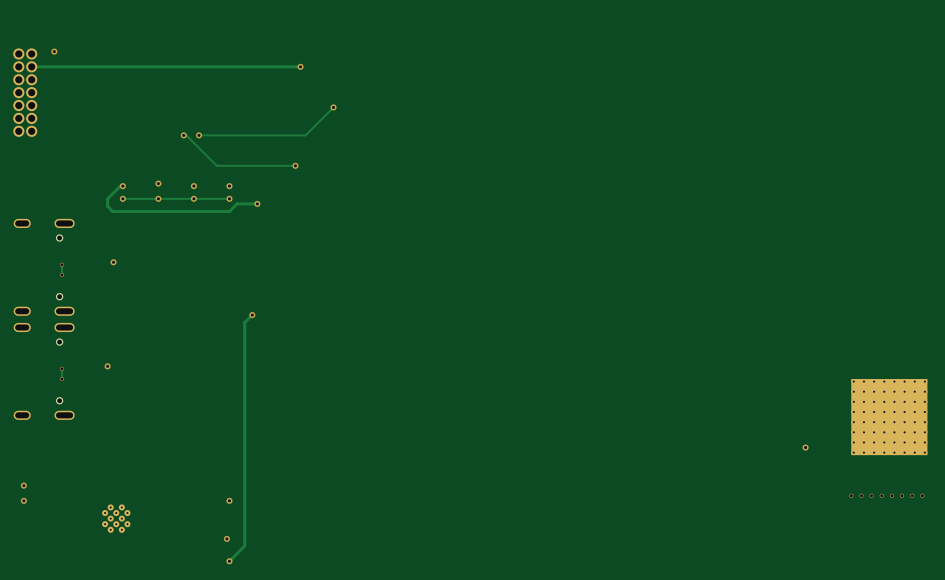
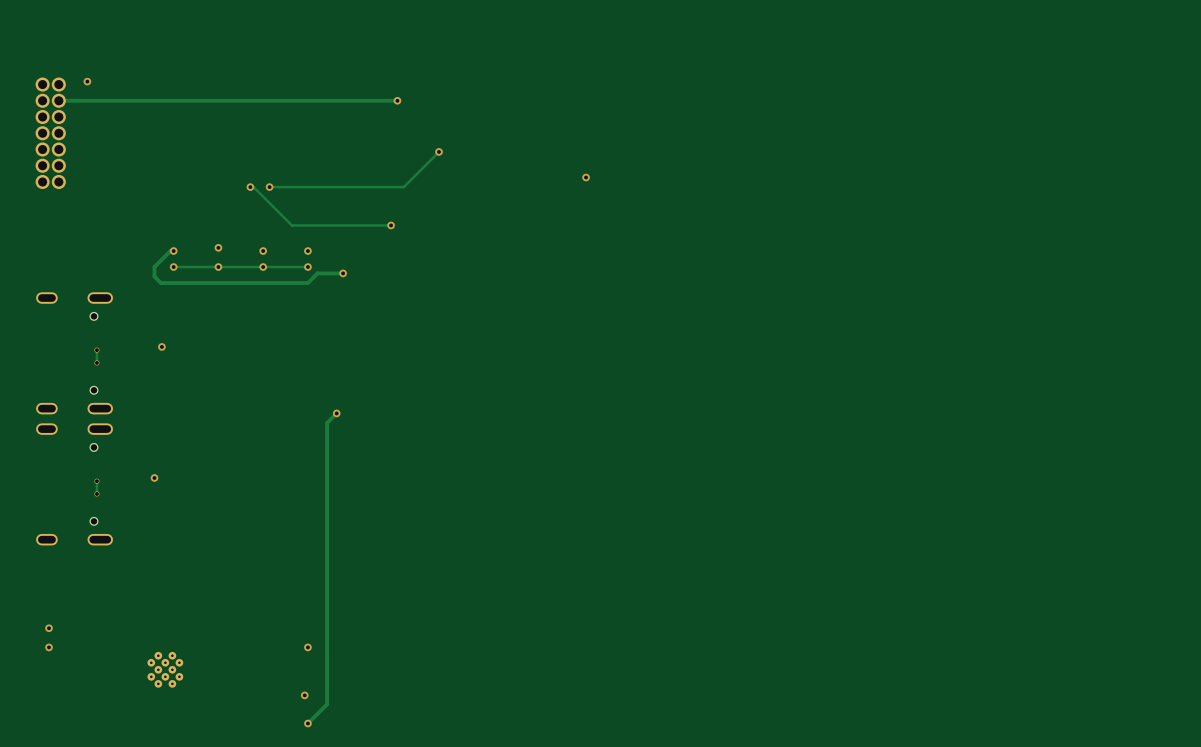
via: none -> (586, 177)
part: (889, 417) -> none
via: (805, 447) -> none
via: (851, 495) -> none
via: (861, 495) -> none
via: (871, 495) -> none
via: (881, 495) -> none
via: (891, 495) -> none
via: (902, 495) -> none
via: (912, 495) -> none
via: (922, 495) -> none

